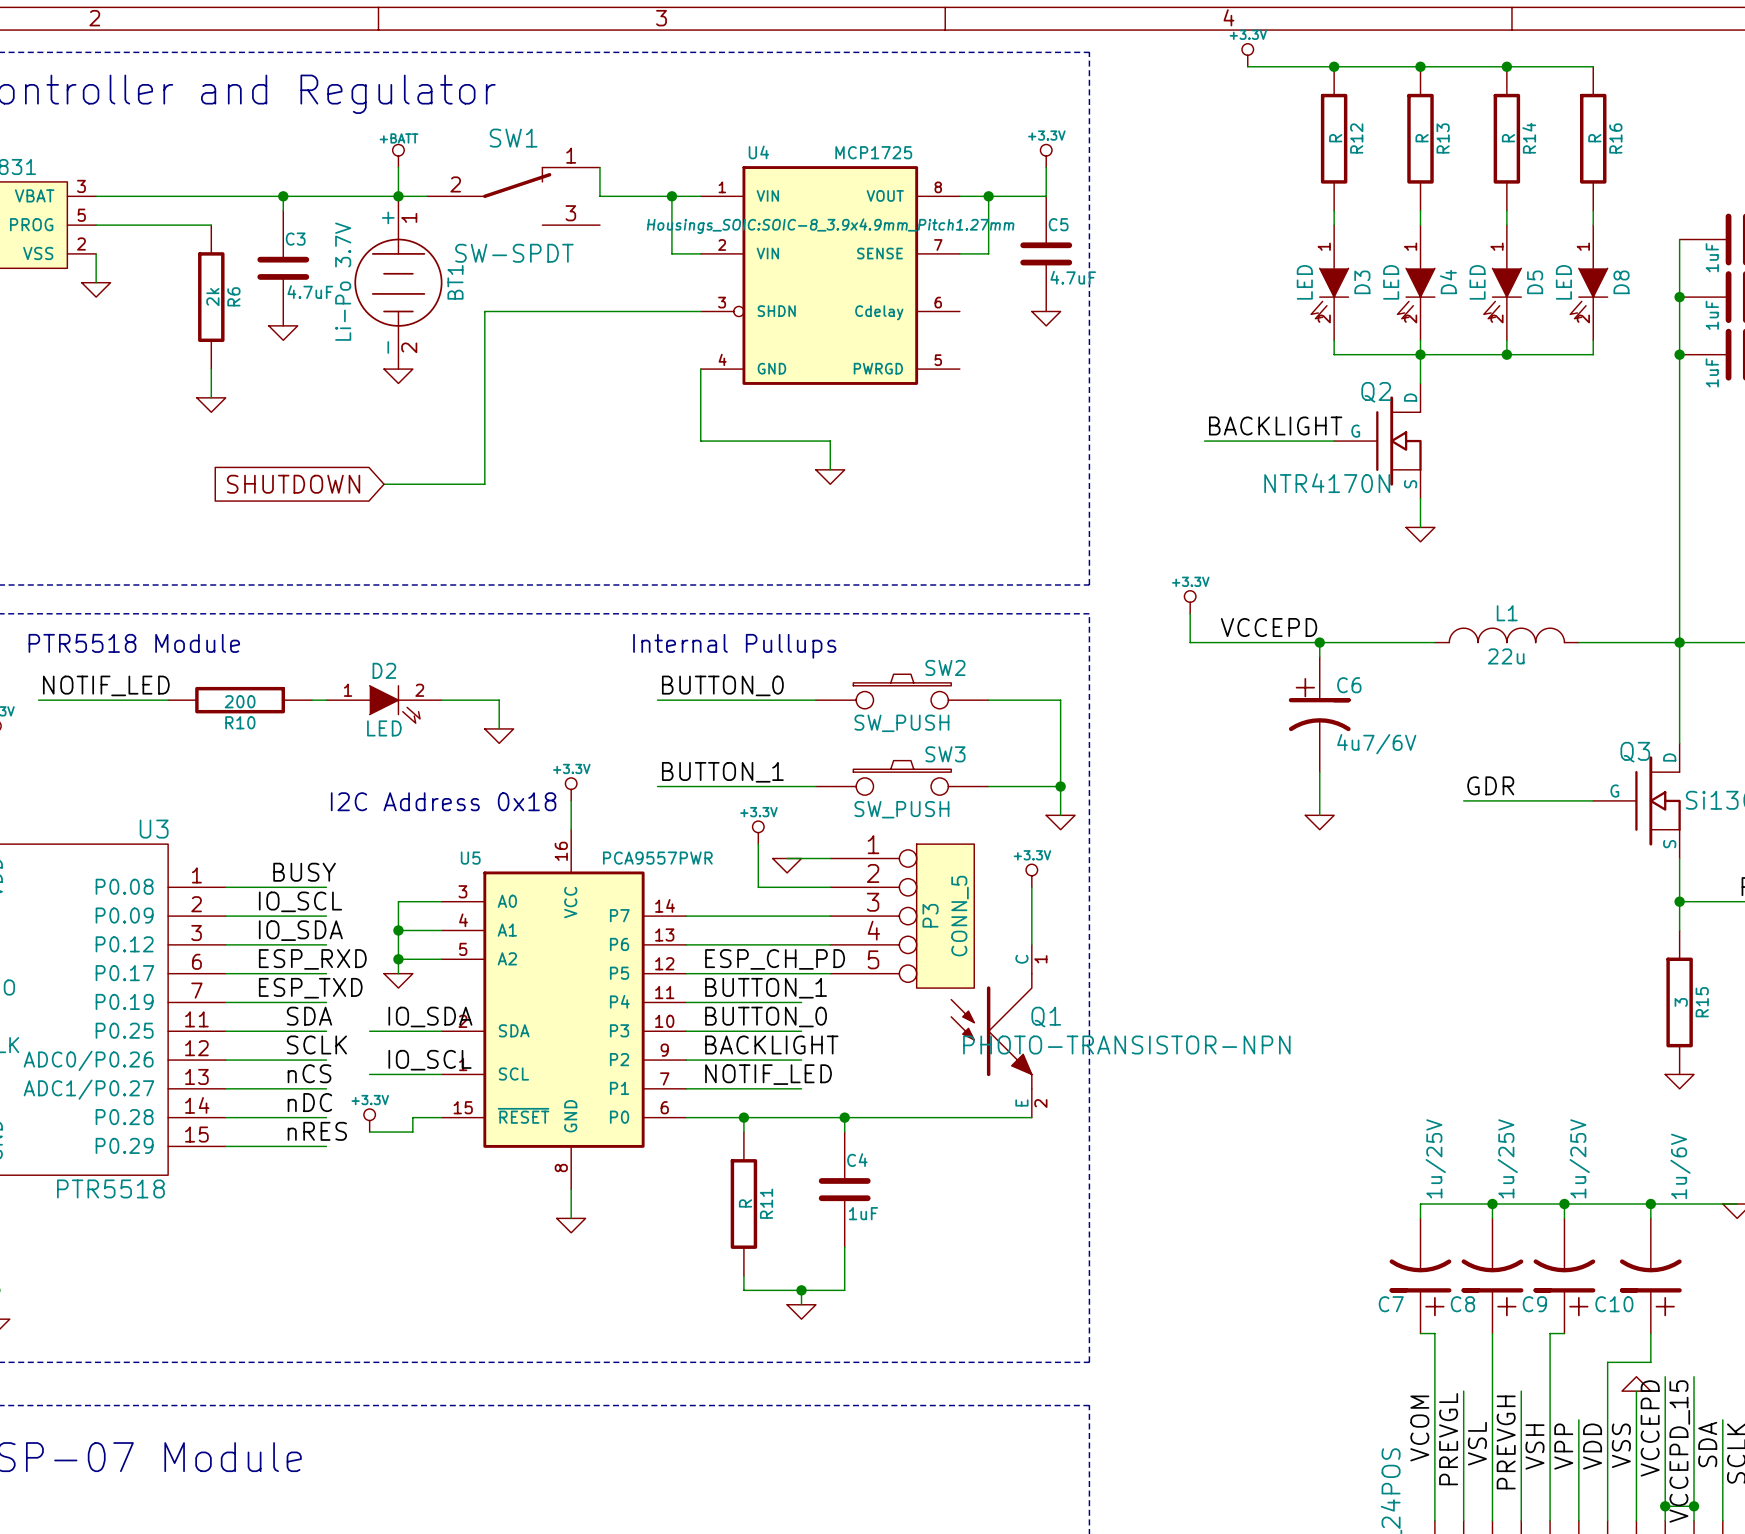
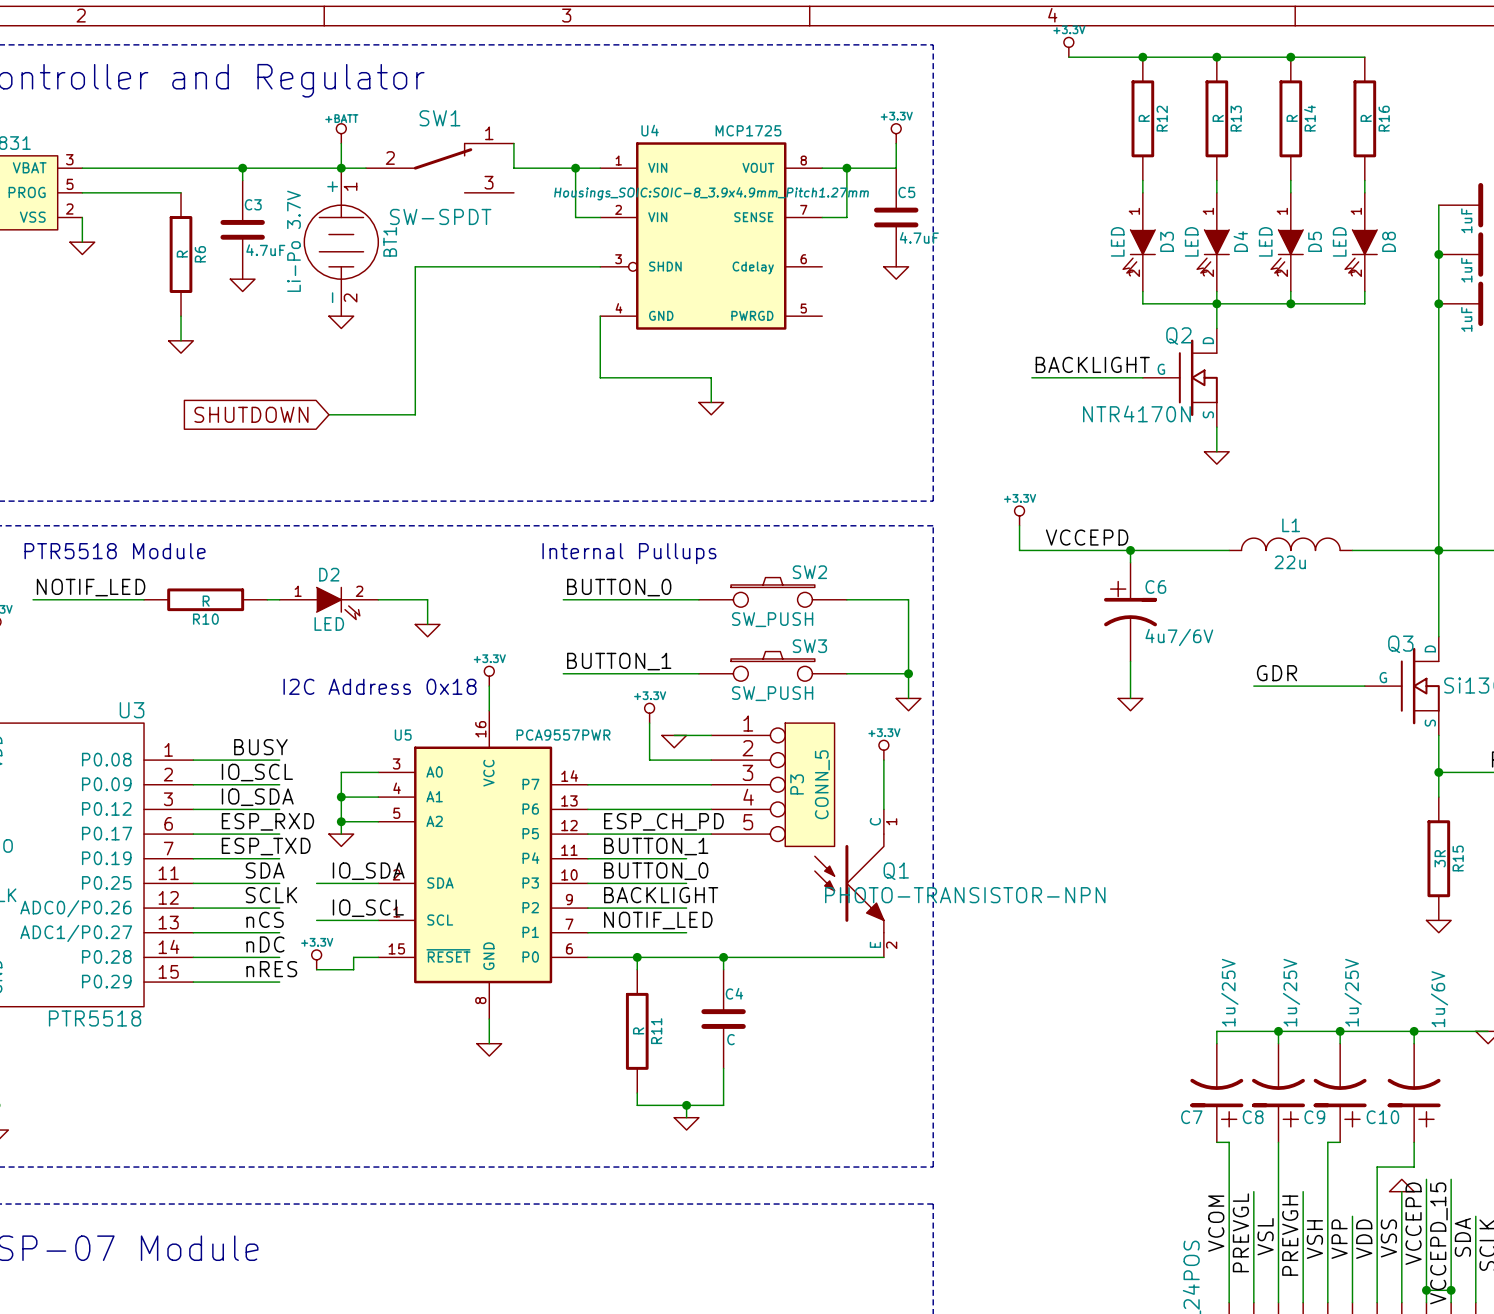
R6 value: 2k (212, 297) -> R (182, 254)
R10 value: 200 (240, 701) -> R (206, 601)
R15 value: 3 (1681, 1002) -> 3R (1440, 858)
C4 value: 1uF (863, 1213) -> C (730, 1039)

